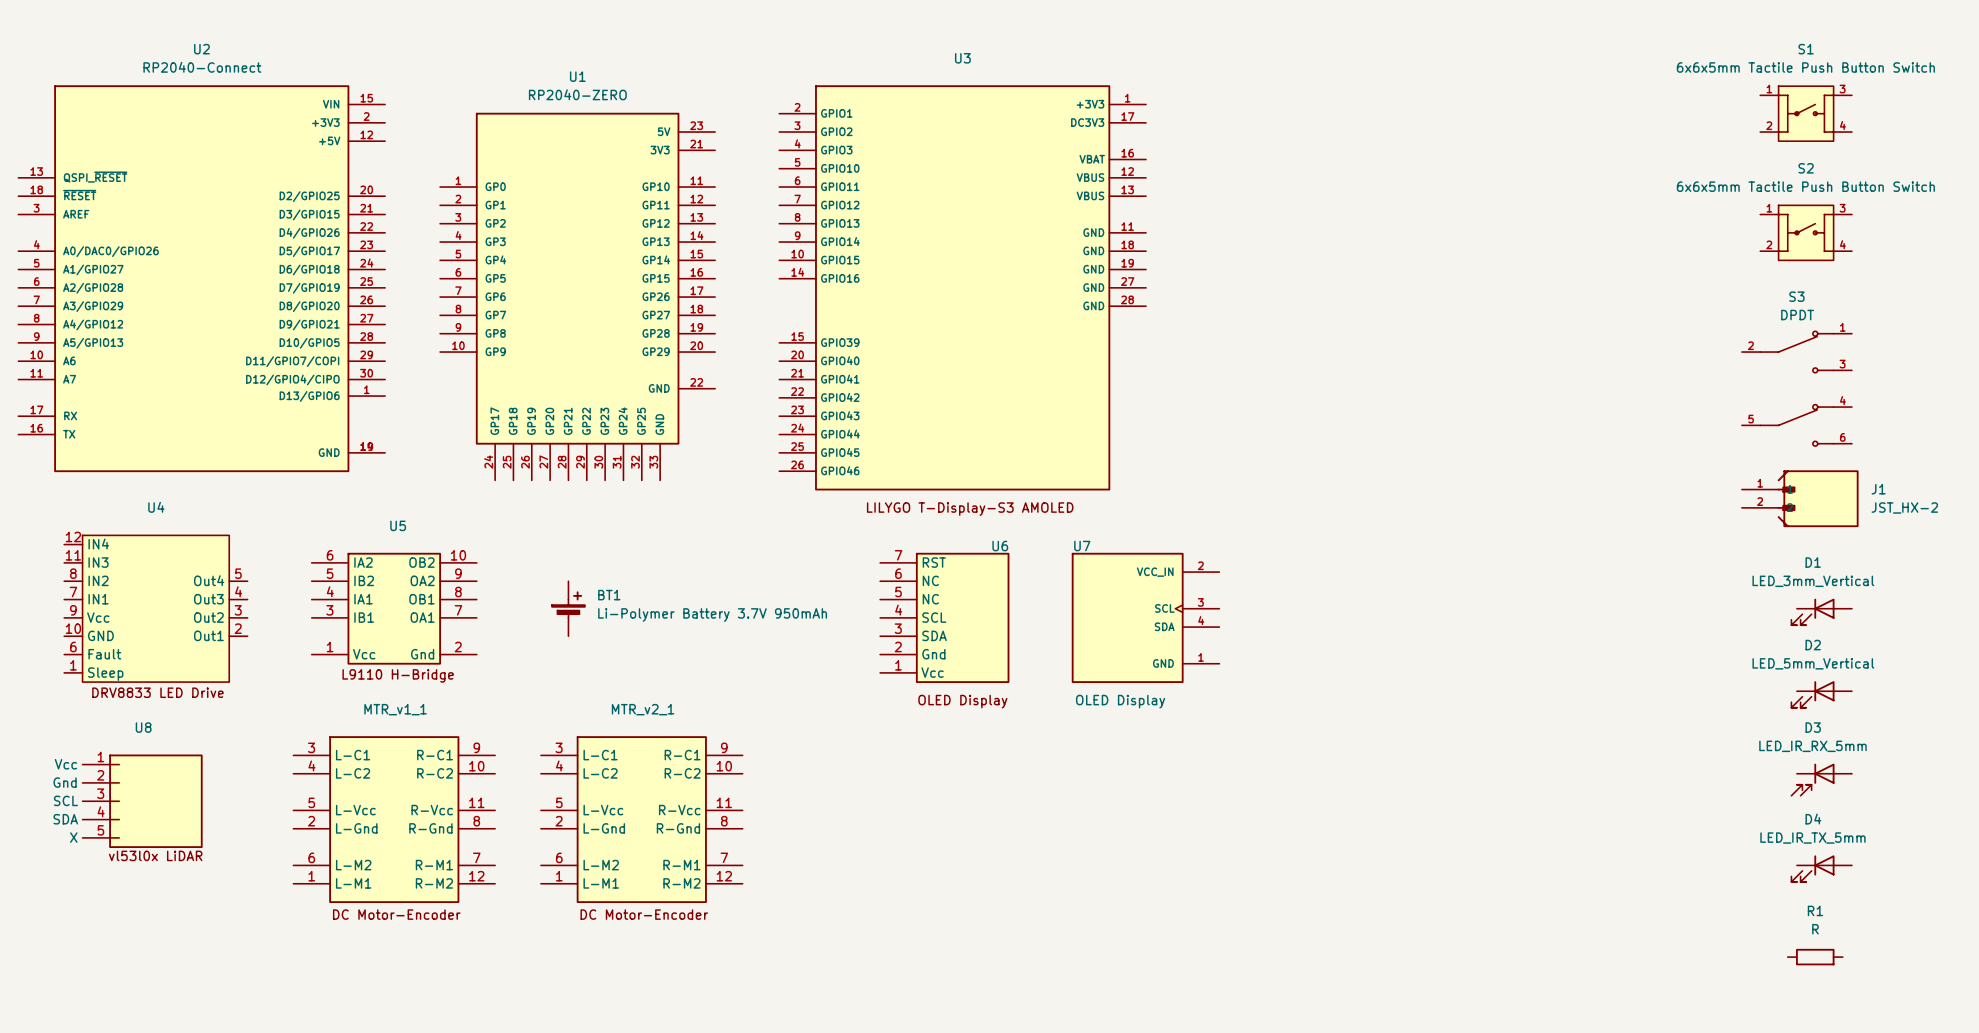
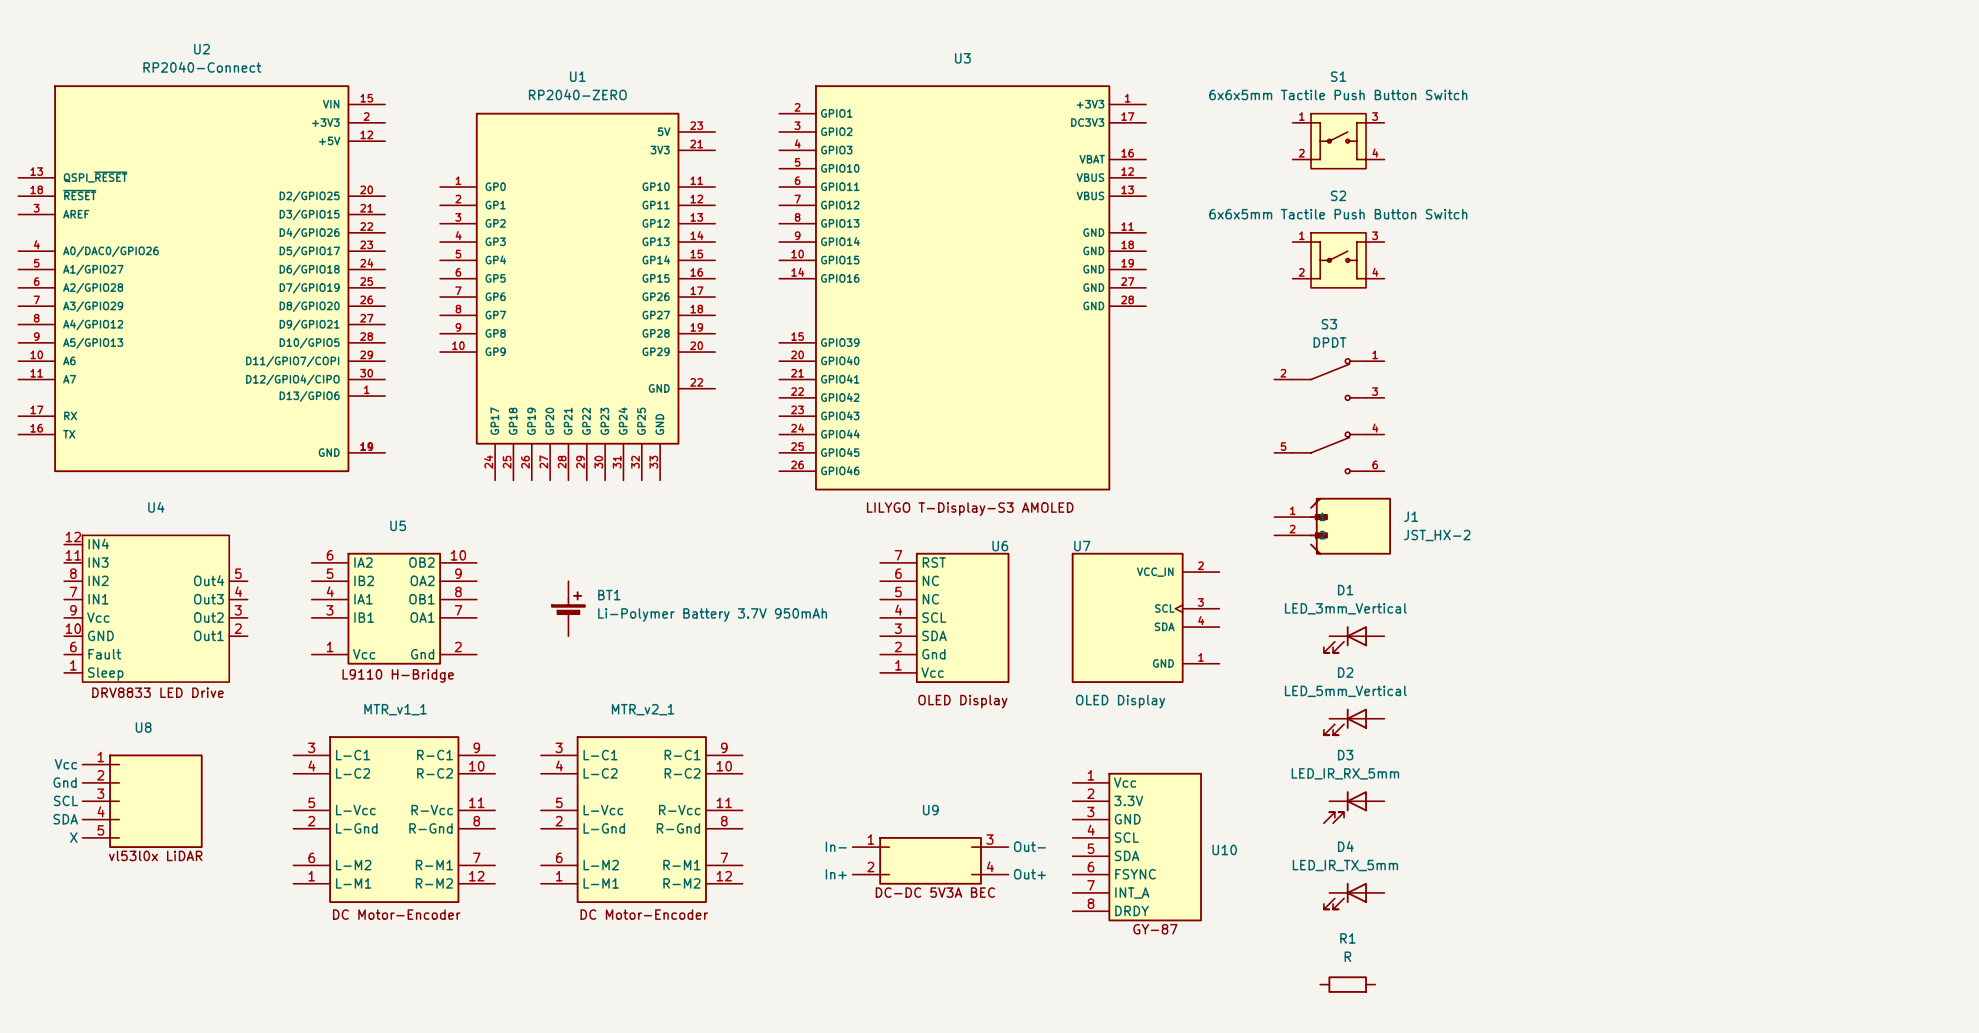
S1 position: (1806, 113) -> (1338, 141)
S2 position: (1806, 232) -> (1338, 260)
S3 position: (1796, 388) -> (1329, 416)
J1 position: (1800, 498) -> (1332, 526)
D1 position: (1821, 611) -> (1354, 639)
D2 position: (1821, 694) -> (1354, 721)
D3 position: (1821, 779) -> (1354, 807)
U10: none -> (1137, 847)
U9: none -> (930, 860)
D4 position: (1821, 868) -> (1354, 896)
R1 position: (1815, 957) -> (1347, 984)

